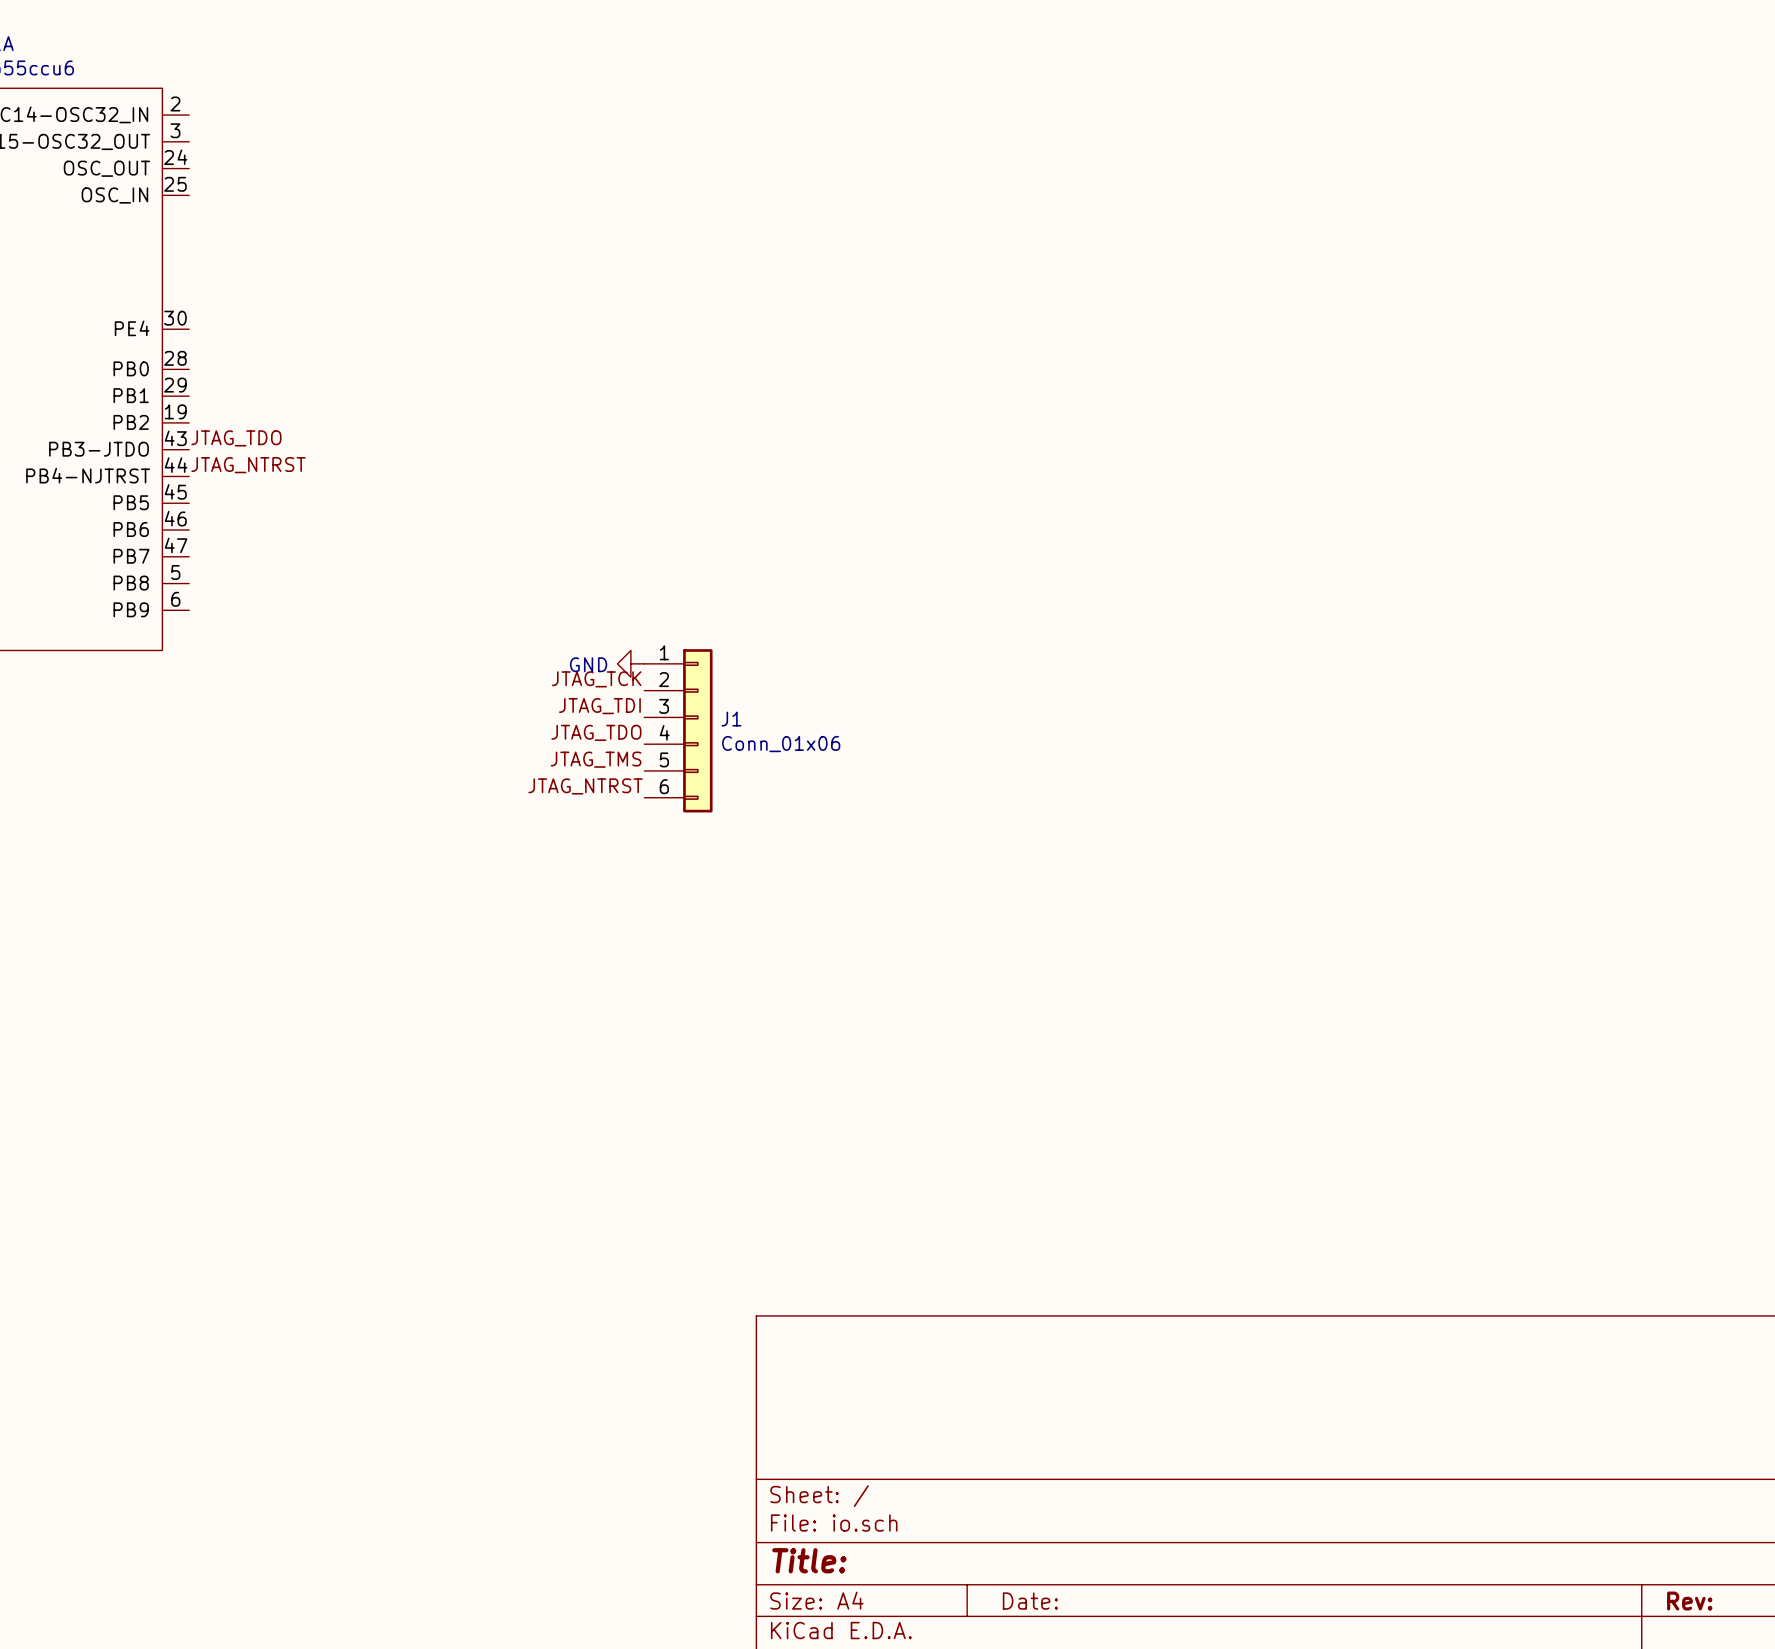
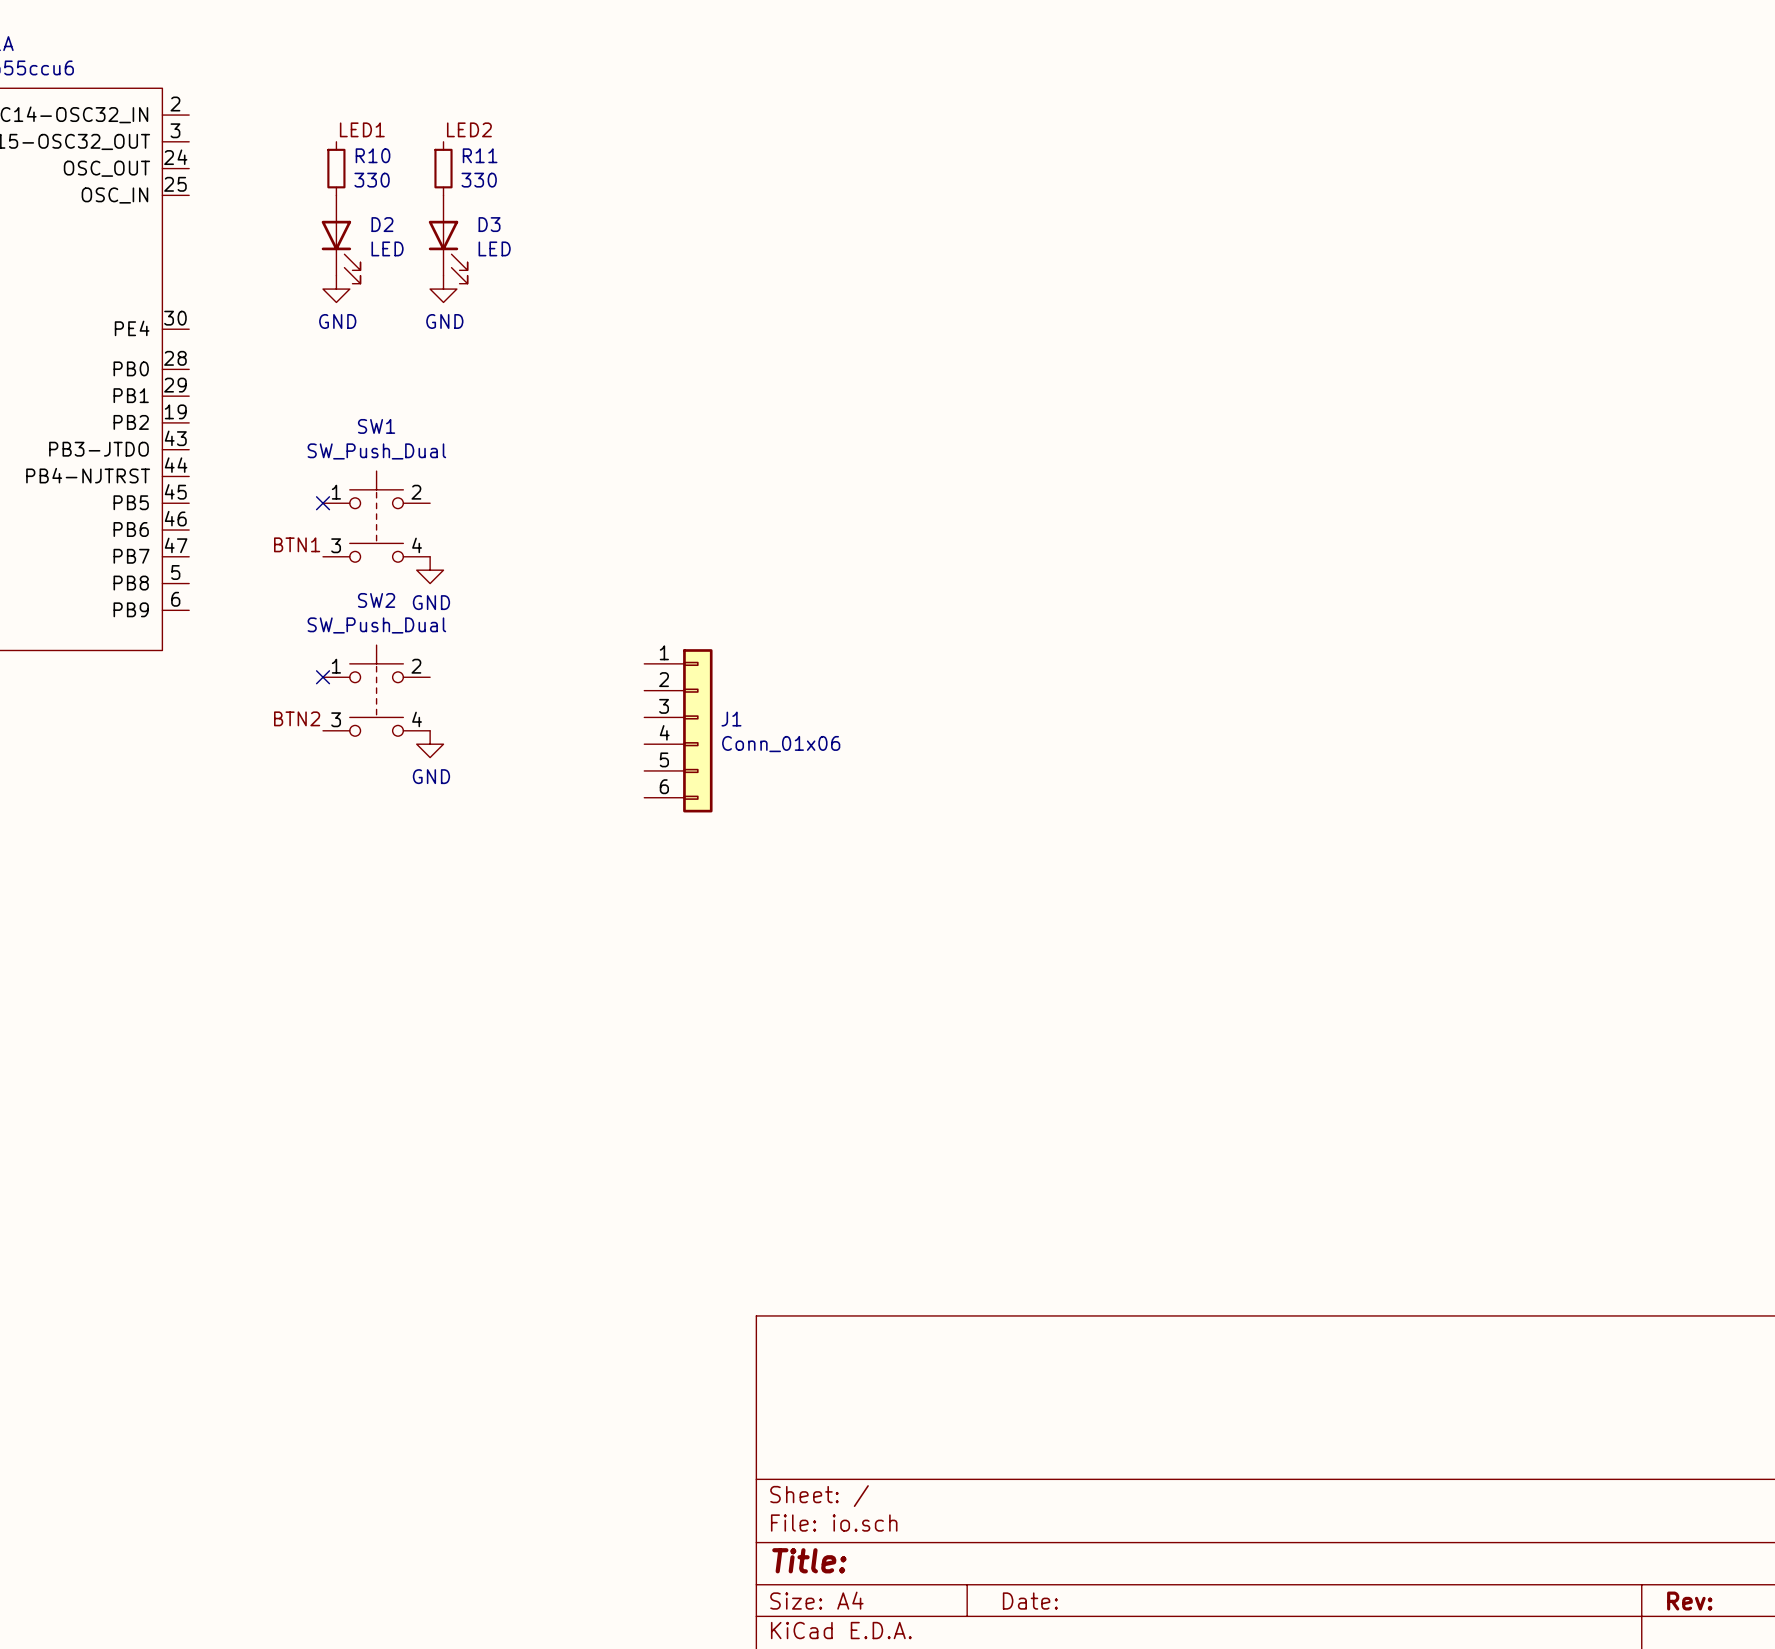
label: none -> LED1 (362, 129)
label: none -> LED2 (469, 129)
R10: none -> 330 (336, 168)
R11: none -> 330 (443, 168)
D2: none -> LED (341, 239)
D3: none -> LED (448, 239)
power symbol: none -> GND (336, 289)
power symbol: none -> GND (443, 289)
label: JTAG_TDO (236, 438) -> none
label: JTAG_NTRST (248, 465) -> none
no-connect mark: none -> (323, 503)
SW1: none -> SW_Push_Dual (376, 516)
label: none -> BTN1 (297, 544)
power symbol: none -> GND (430, 570)
power symbol: GND (630, 663) -> none
no-connect mark: none -> (323, 677)
label: JTAG_TCK (596, 679) -> none
SW2: none -> SW_Push_Dual (376, 690)
label: JTAG_TDI (599, 706) -> none
label: none -> BTN2 (297, 718)
label: JTAG_TDO (596, 732) -> none
power symbol: none -> GND (430, 744)
label: JTAG_TMS (596, 759) -> none
label: JTAG_NTRST (585, 786) -> none

